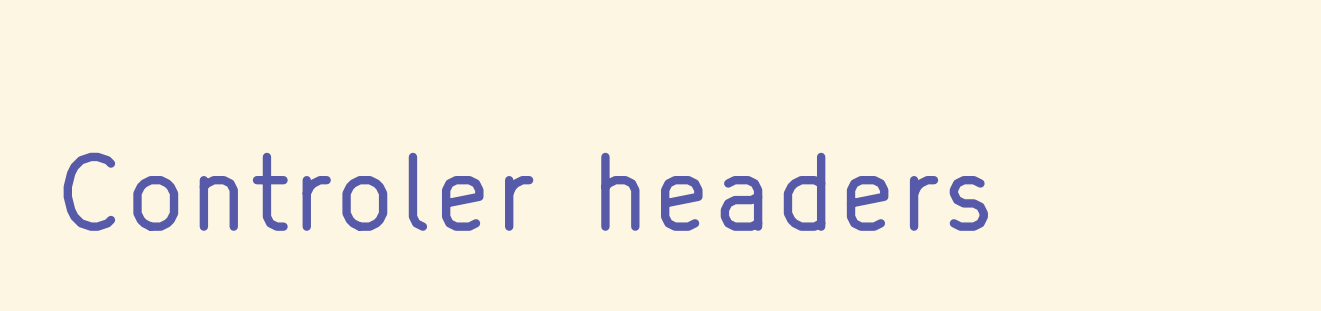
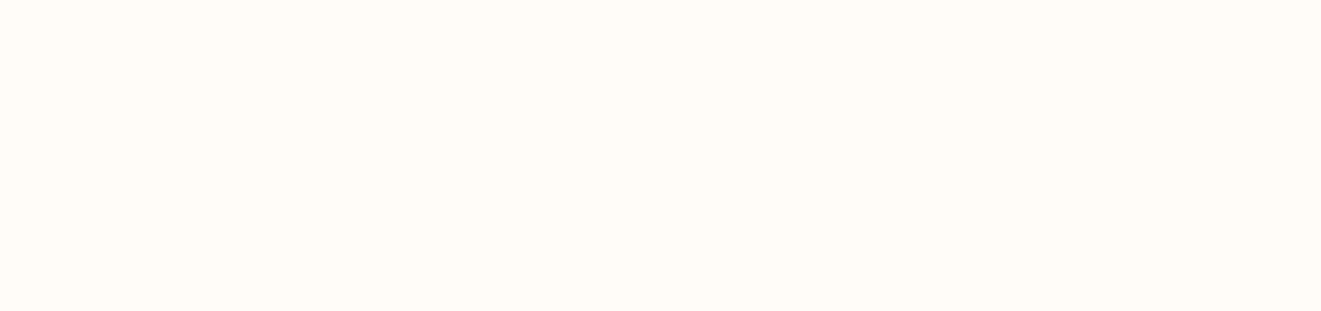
text: Controler headers (525, 191) -> none

